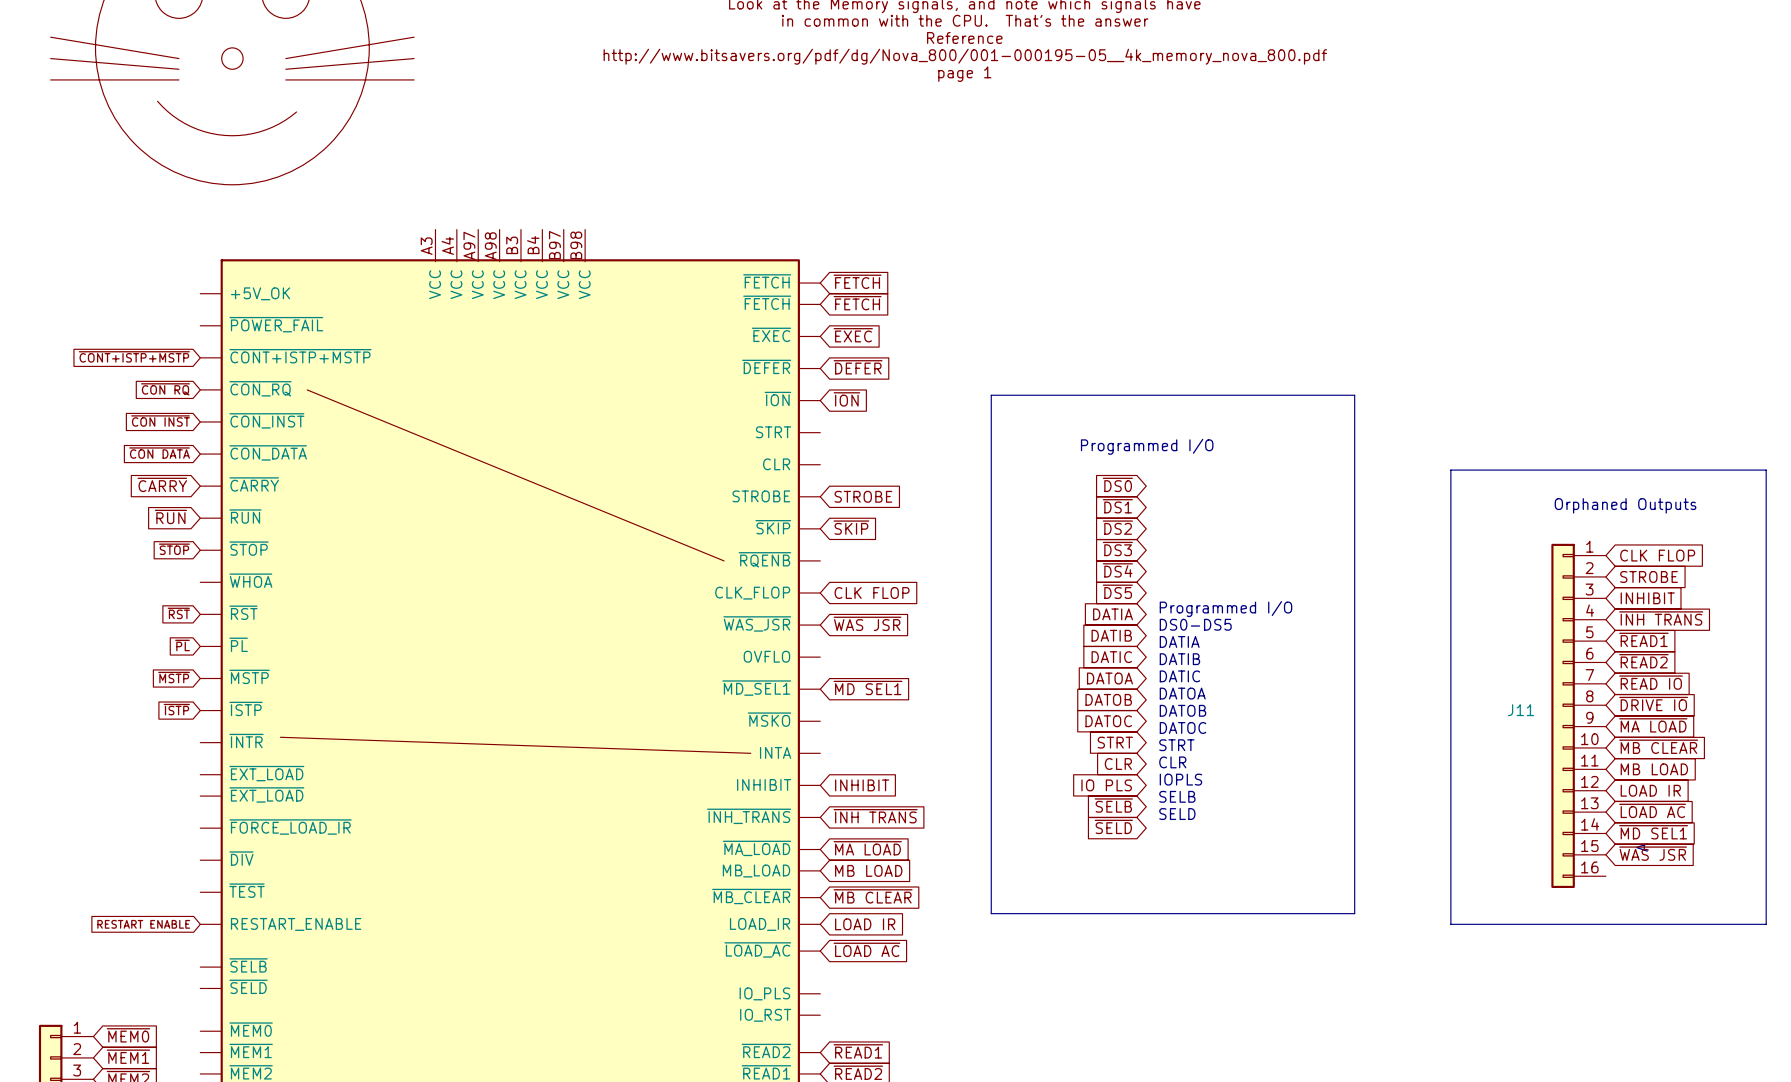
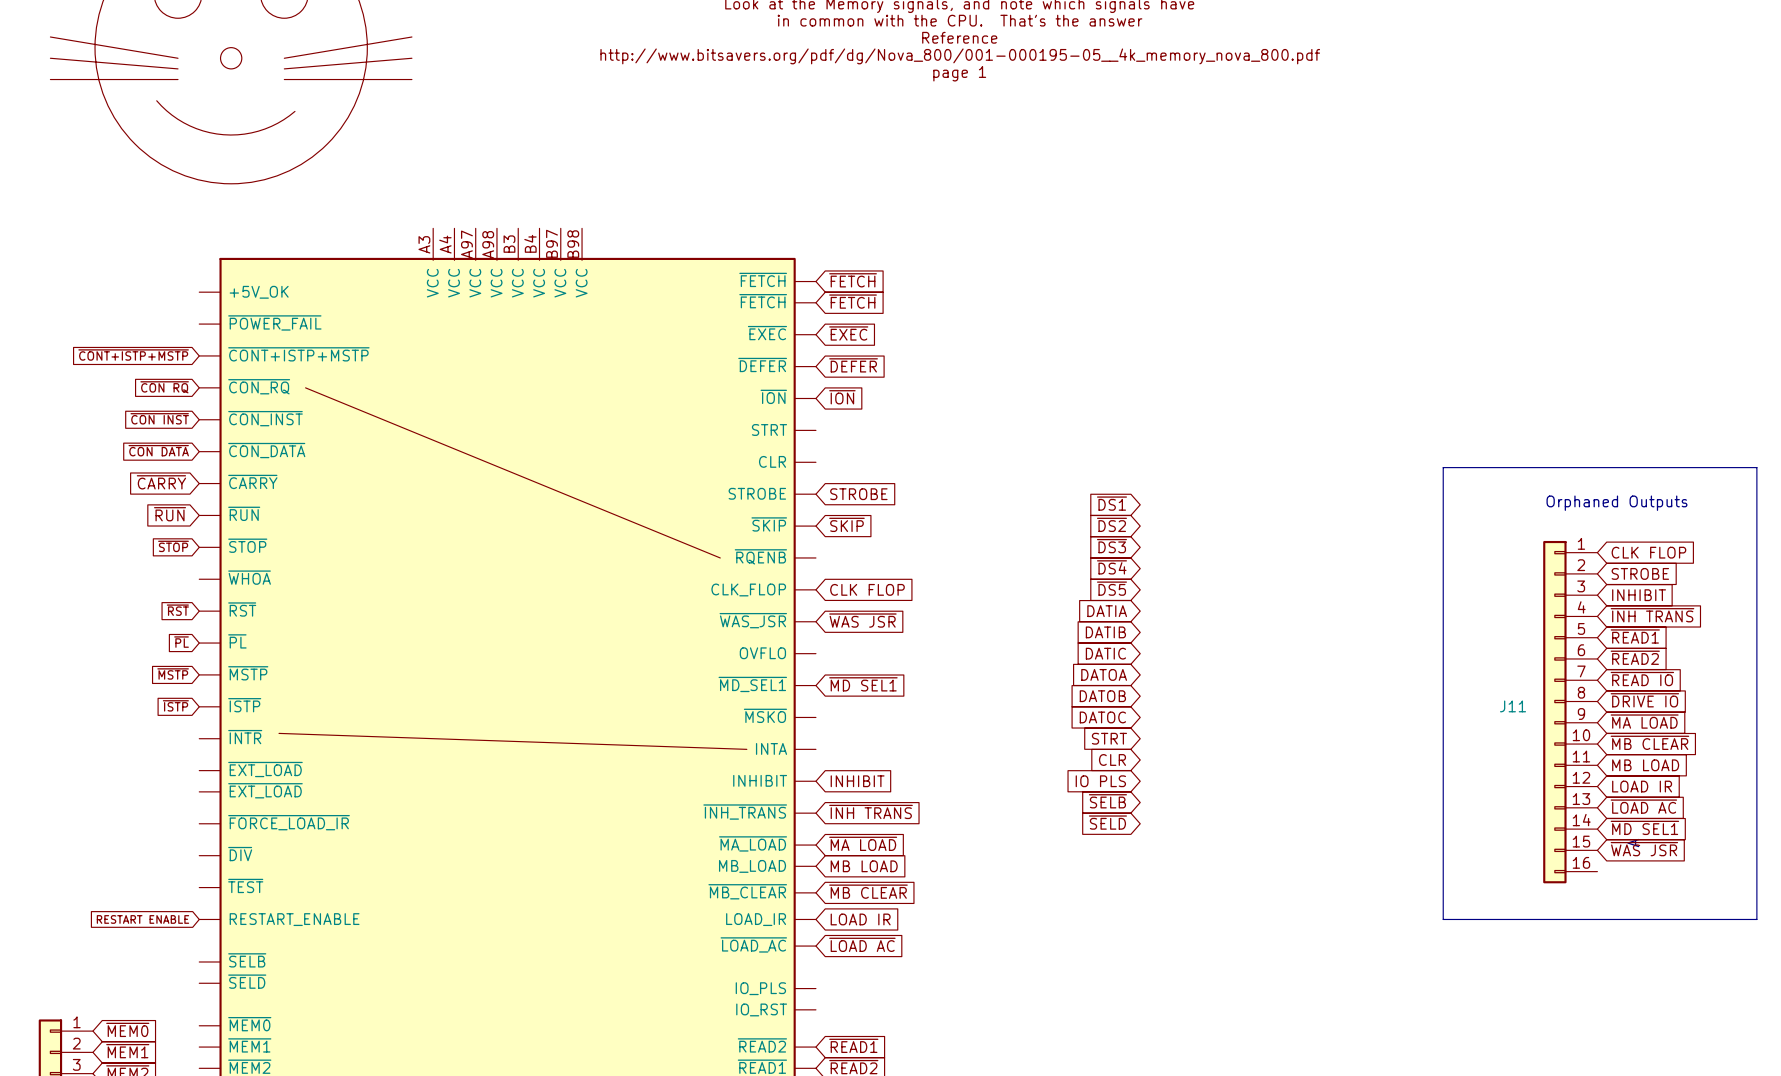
line: (991, 395) (1354, 395) (1354, 913) (991, 913) (991, 395) -> none
text: Programmed I/O (1147, 446) -> none
global label: ~{DS0} (1117, 484) -> none
text: Programmed I/O (1225, 609) -> none
text: DS0-DS5 (1195, 624) -> none
text: DATIA (1179, 641) -> none
text: DATIB (1179, 659) -> none
text: DATIC (1179, 676) -> none
text: DATOA (1182, 693) -> none
text: DATOB (1182, 710) -> none
text: DATOC (1182, 727) -> none
text: STRT (1176, 745) -> none
text: CLR (1172, 762) -> none
text: IOPLS (1180, 779) -> none
text: SELB (1177, 796) -> none
text: SELD (1177, 814) -> none

